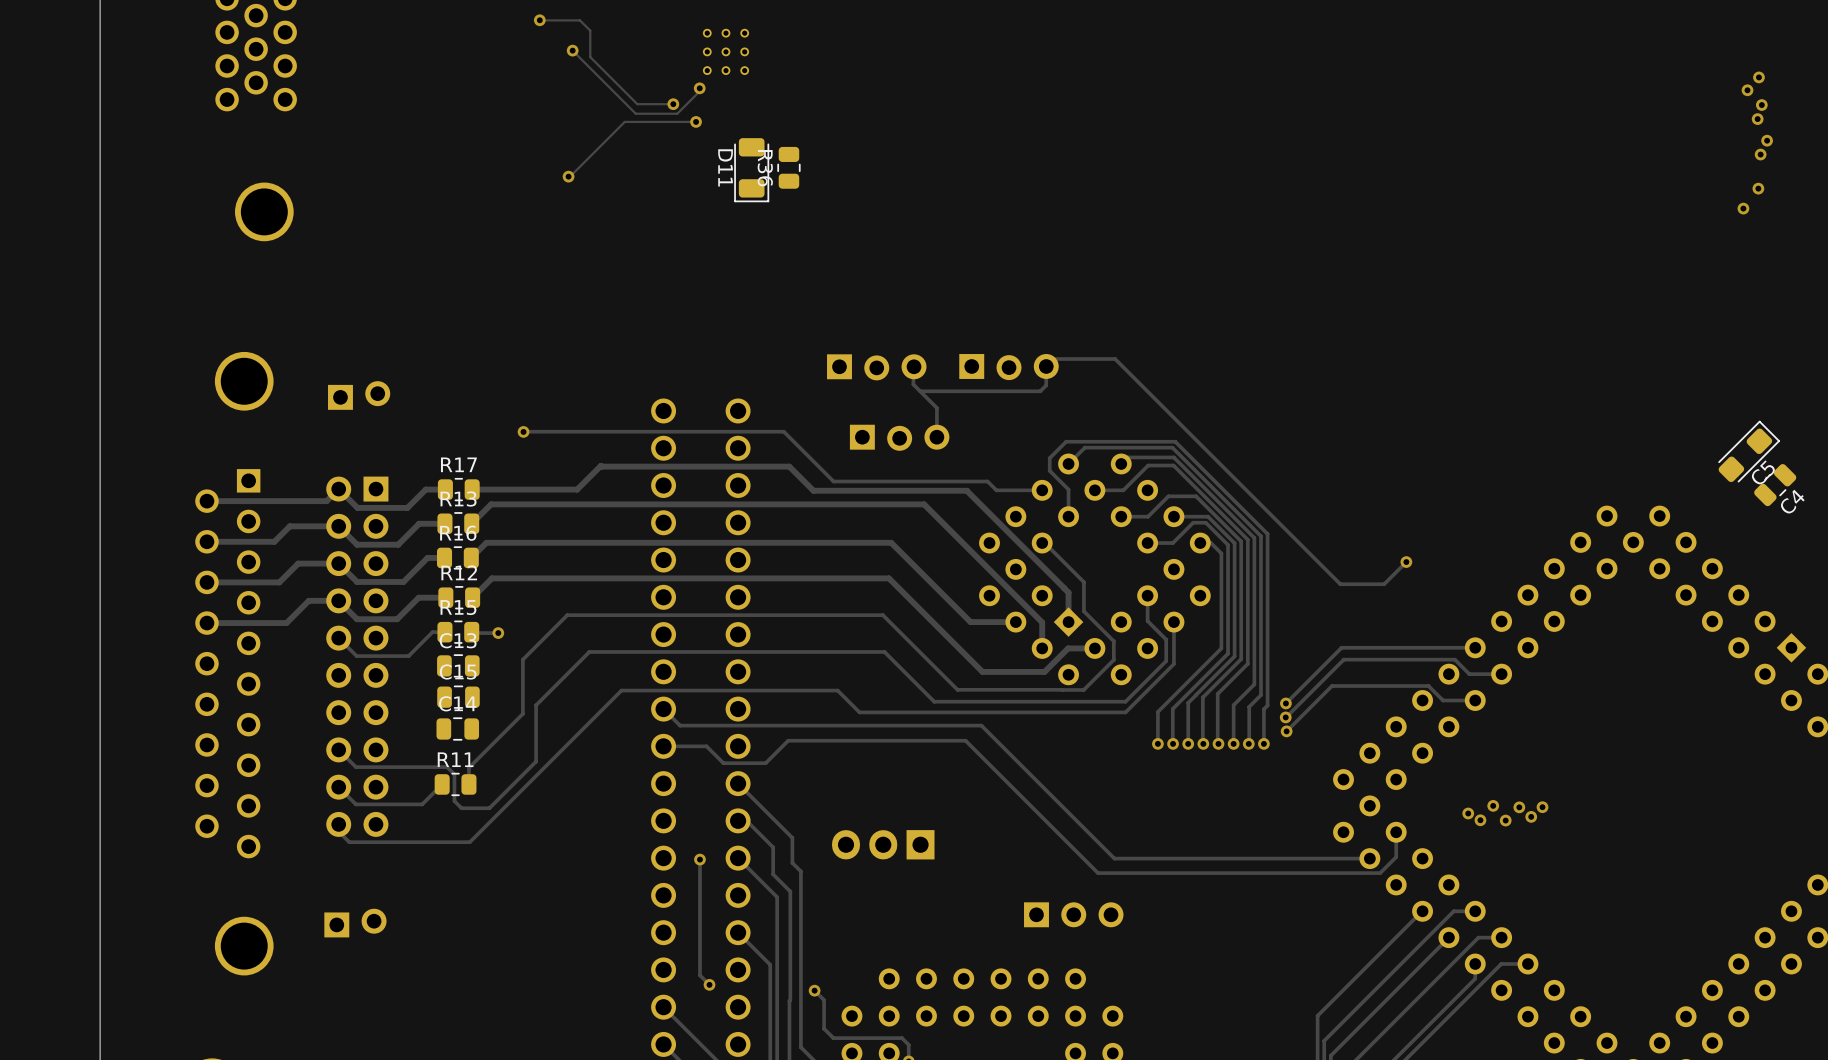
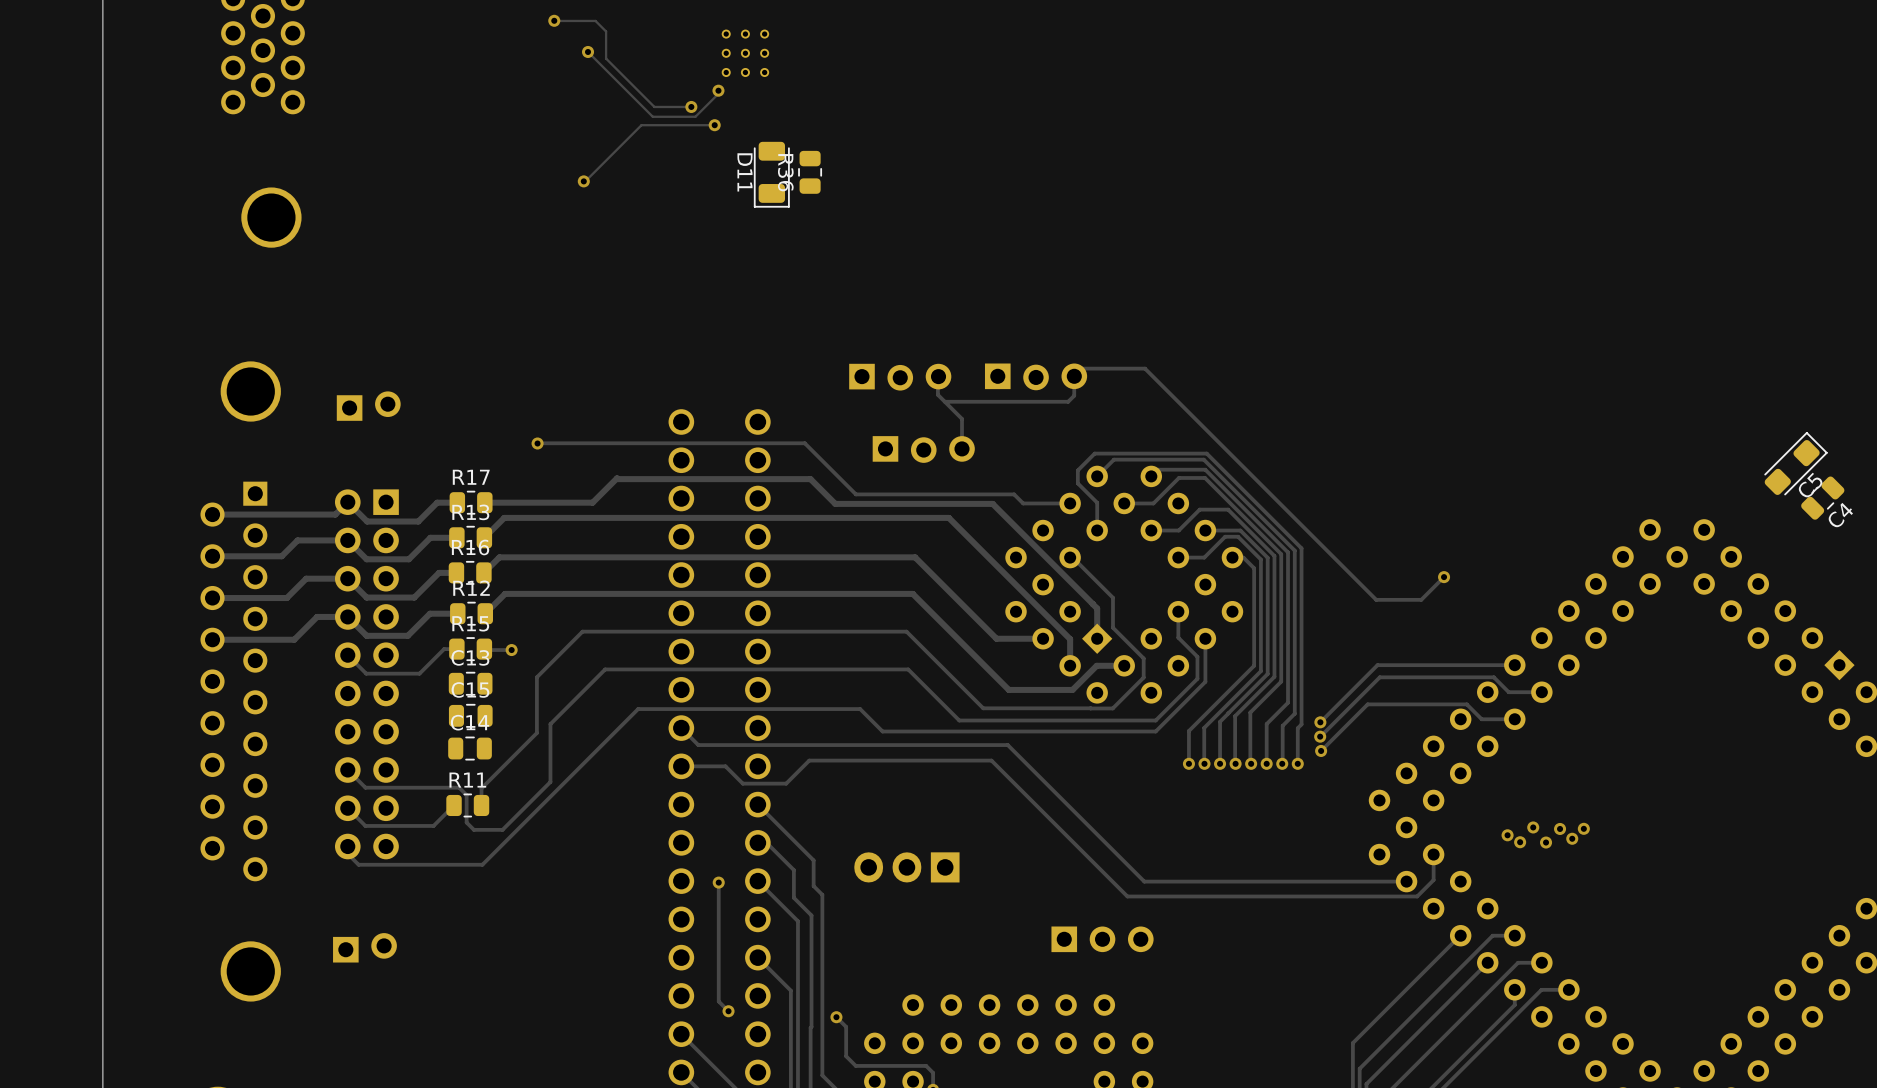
via: (1758, 77) -> none
via: (1747, 90) -> none
via: (1761, 105) -> none
via: (1757, 119) -> none
via: (1767, 140) -> none
via: (1760, 154) -> none
via: (1758, 188) -> none
via: (1743, 208) -> none

